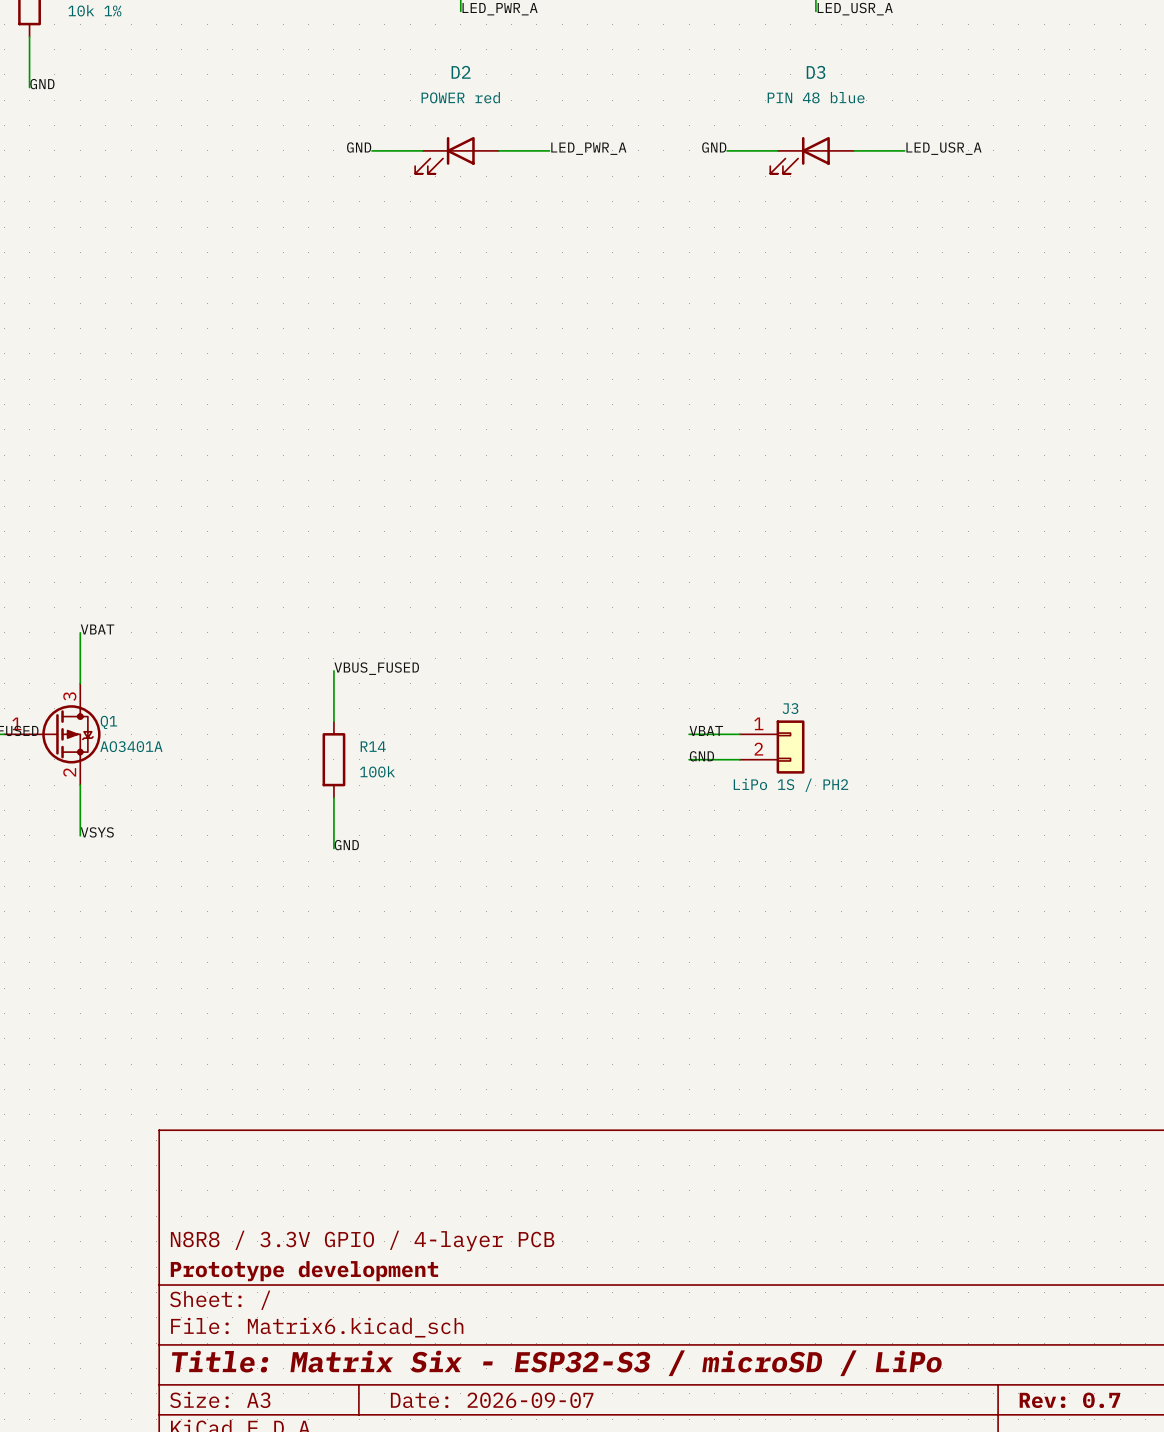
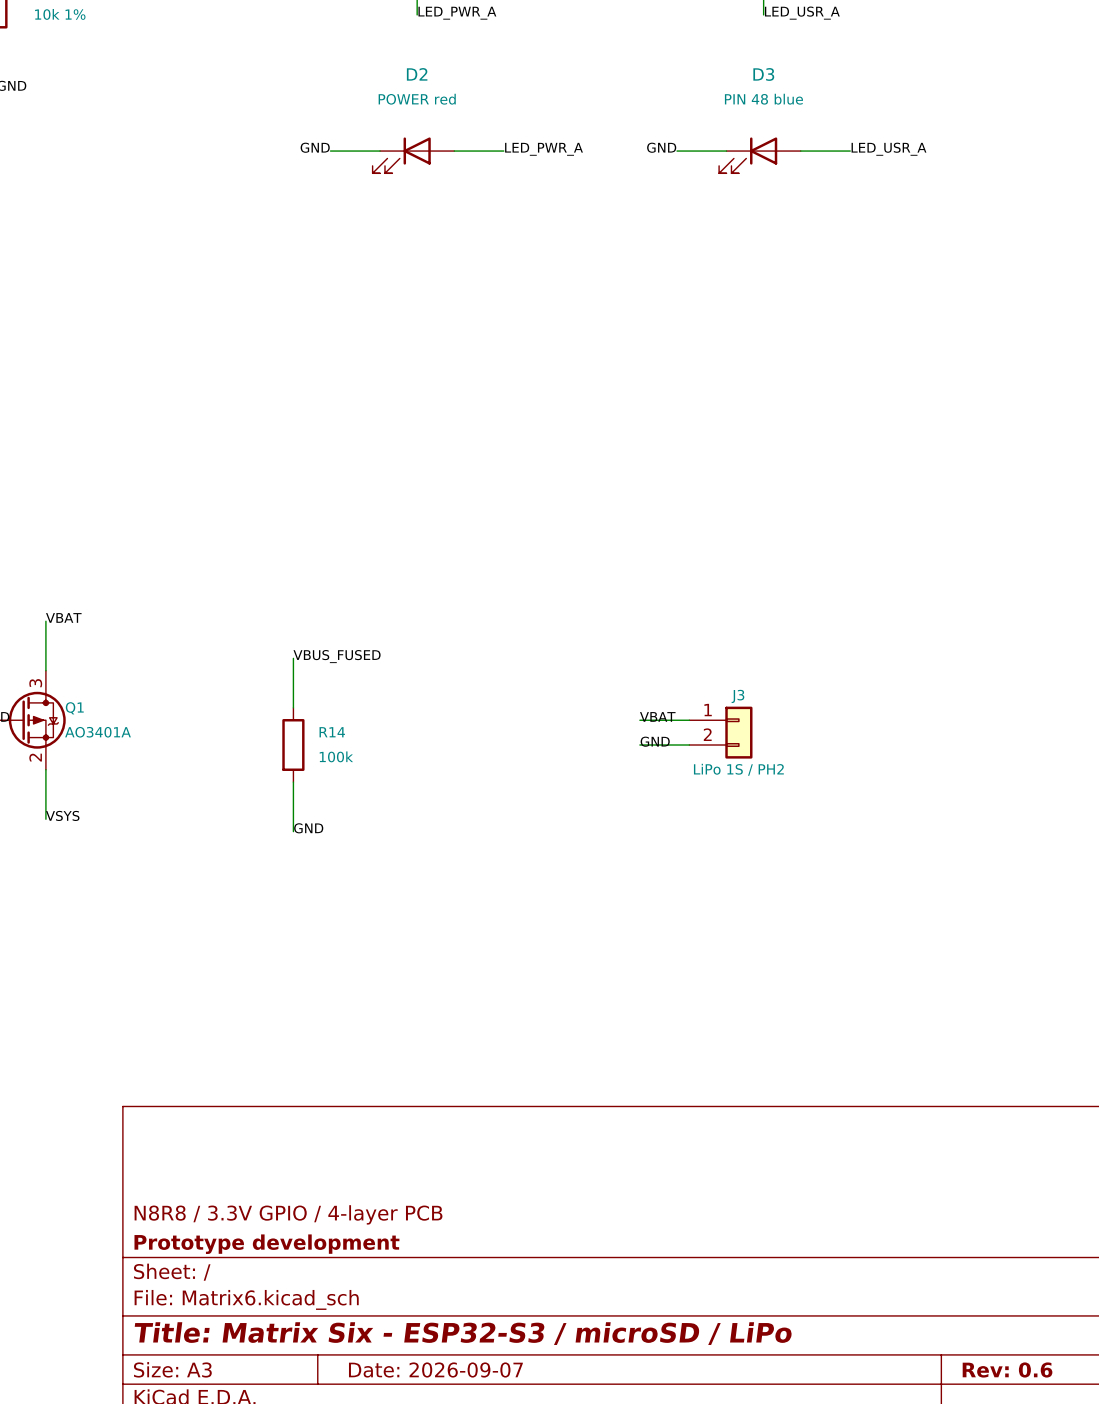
title block: Rev: 0.7 (1069, 1400) -> Rev: 0.6 (1007, 1369)

